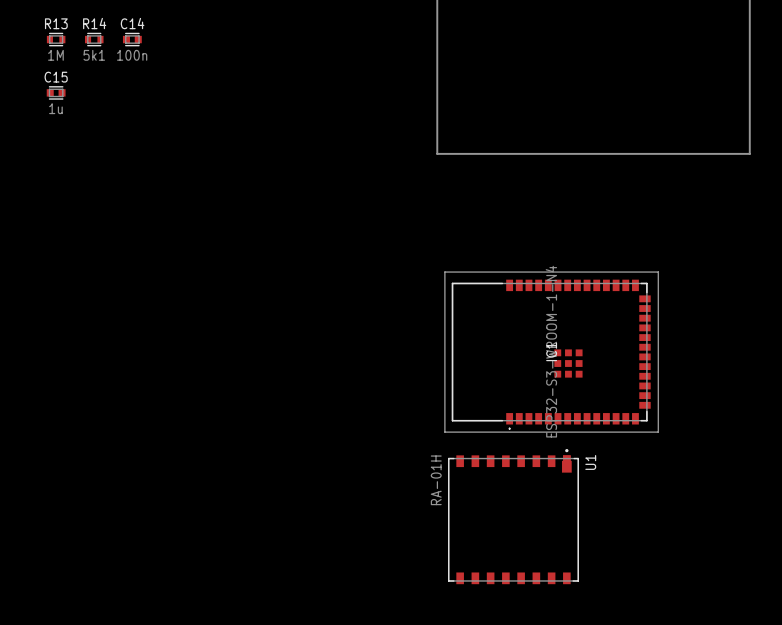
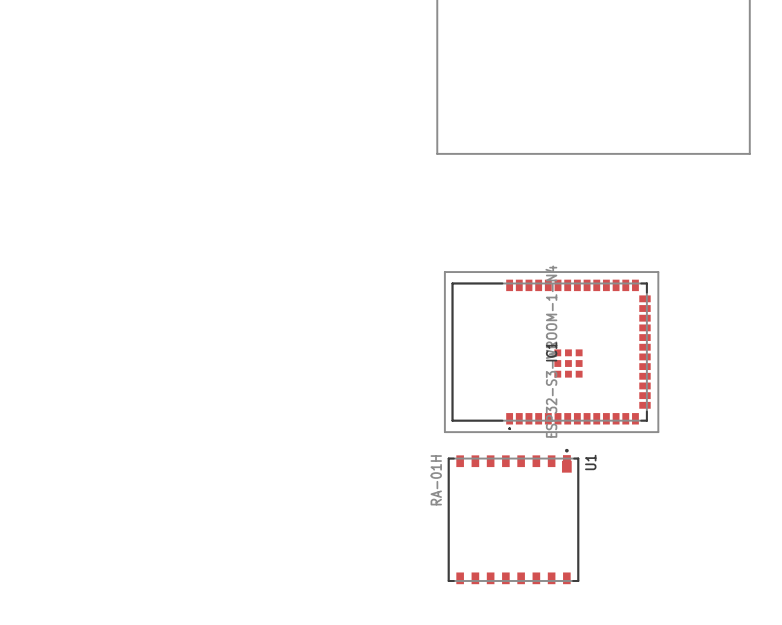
R13: 1M (56, 39) -> none
R14: 5k1 (94, 39) -> none
C14: 100n (132, 39) -> none
C15: 1u (56, 92) -> none

